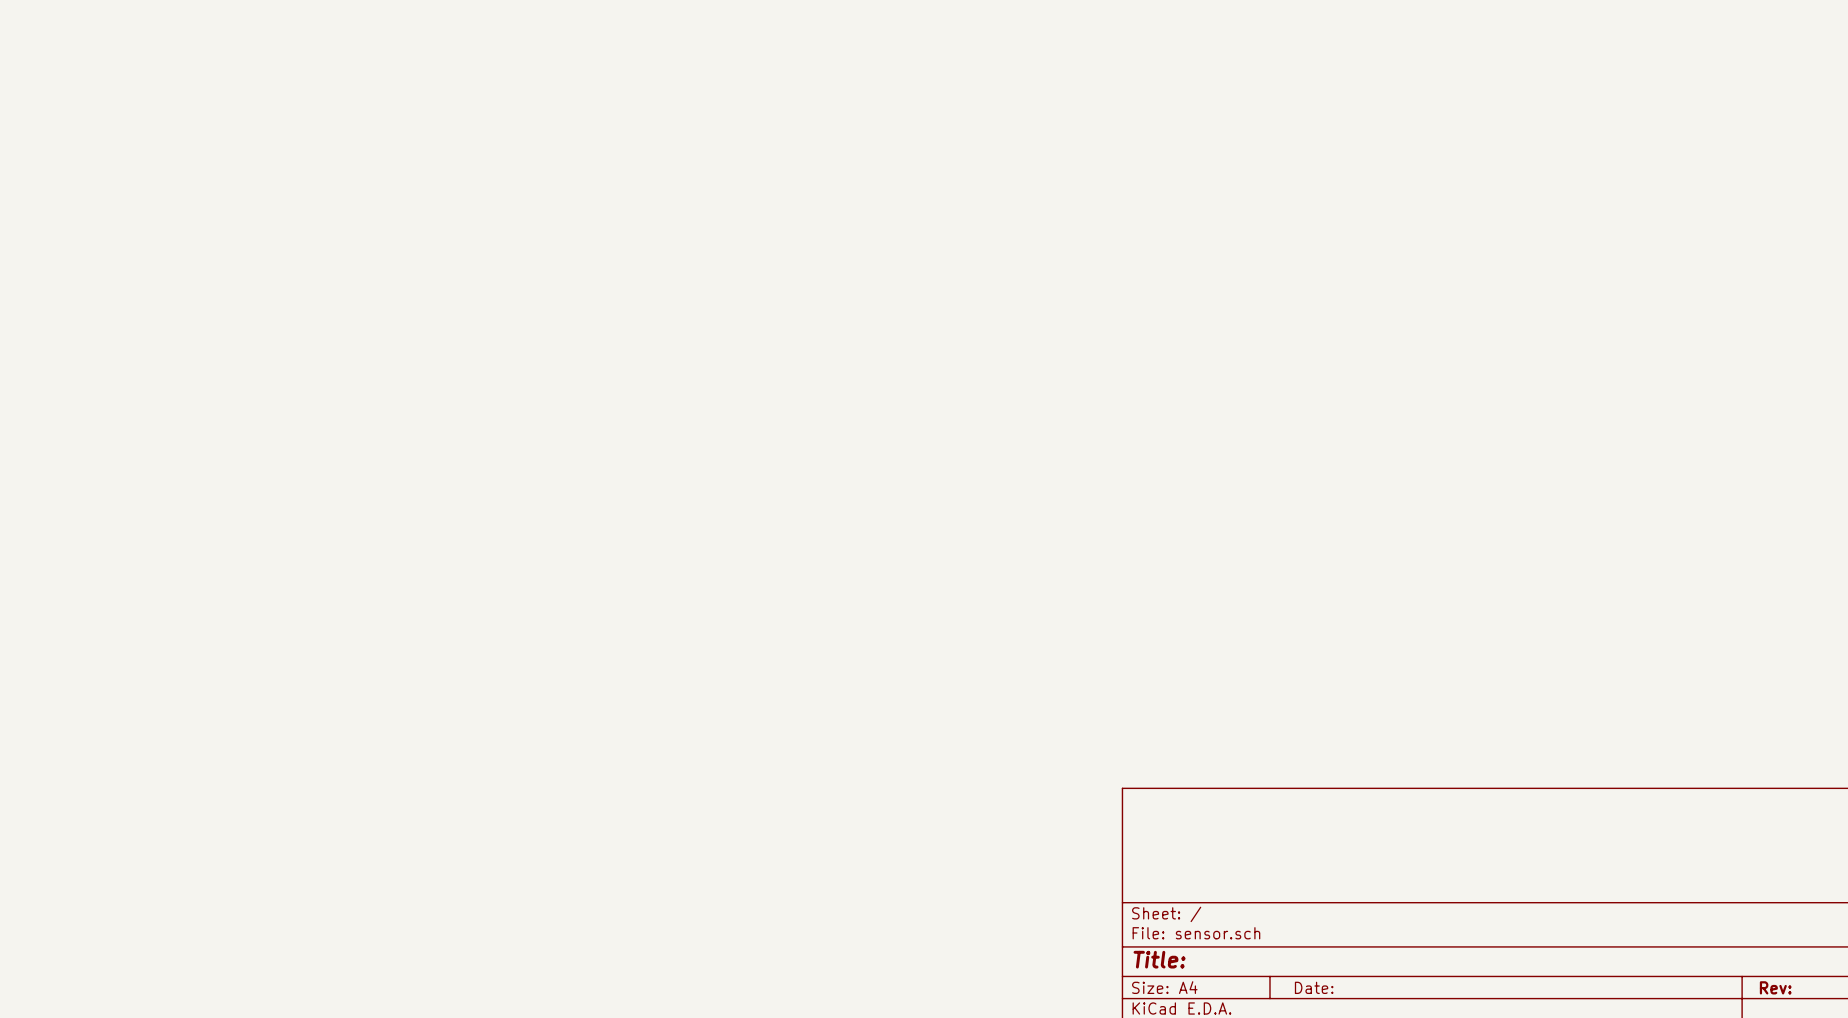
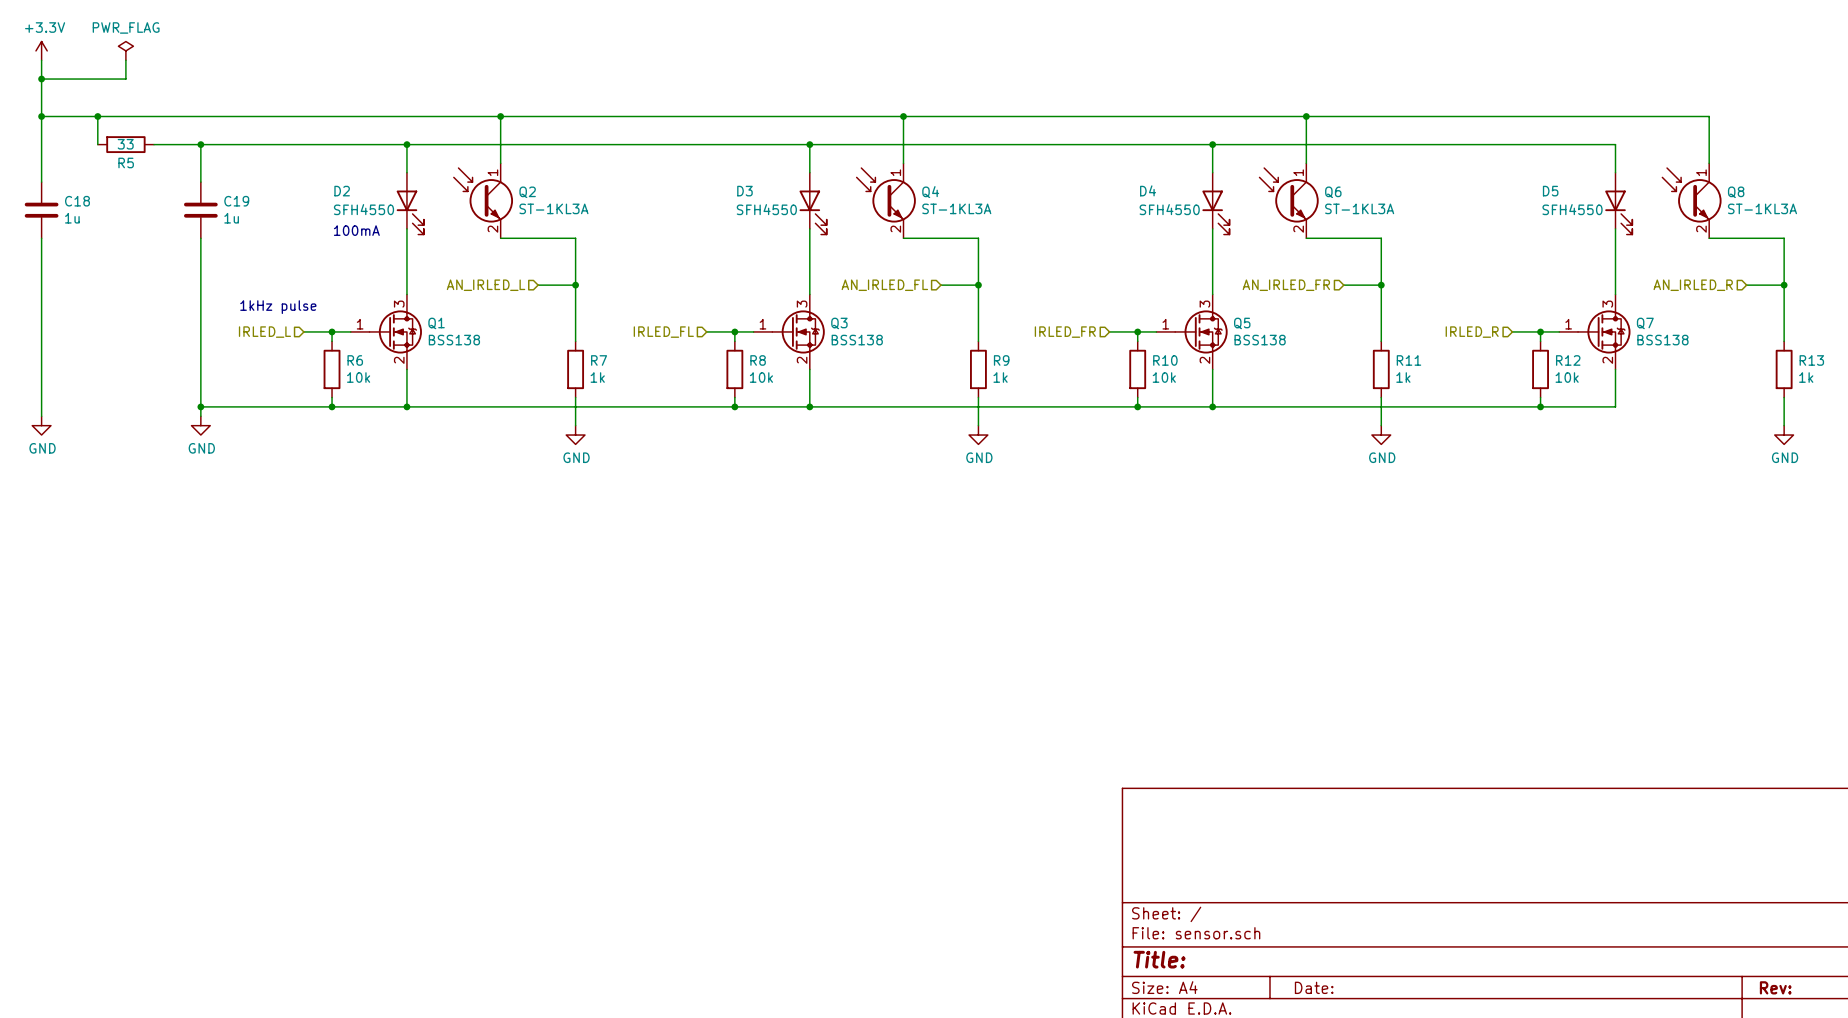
power symbol: none -> +3.3V (41, 50)
power symbol: none -> PWR_FLAG (125, 50)
wire: none -> (41, 60) (41, 182)
wire: none -> (125, 60) (125, 79) (41, 79)
junction: none -> (41, 79)
wire: none -> (41, 116) (1709, 116) (1709, 163)
junction: none -> (41, 116)
wire: none -> (97, 116) (97, 144)
junction: none -> (97, 116)
wire: none -> (500, 116) (500, 163)
junction: none -> (500, 116)
wire: none -> (903, 116) (903, 163)
junction: none -> (903, 116)
wire: none -> (1306, 116) (1306, 163)
junction: none -> (1306, 116)
R5: none -> 33 (125, 144)
wire: none -> (154, 144) (1615, 144) (1615, 172)
wire: none -> (200, 144) (200, 182)
junction: none -> (200, 144)
wire: none -> (406, 144) (406, 172)
junction: none -> (406, 144)
wire: none -> (809, 144) (809, 172)
junction: none -> (809, 144)
wire: none -> (1212, 144) (1212, 172)
junction: none -> (1212, 144)
Q2: none -> ST-1KL3A (483, 200)
Q4: none -> ST-1KL3A (886, 200)
Q6: none -> ST-1KL3A (1289, 200)
Q8: none -> ST-1KL3A (1691, 200)
D2: none -> SFH4550 (410, 203)
D3: none -> SFH4550 (813, 203)
D4: none -> SFH4550 (1215, 203)
D5: none -> SFH4550 (1618, 203)
C18: none -> 1u (41, 210)
C19: none -> 1u (200, 210)
wire: none -> (406, 228) (406, 294)
wire: none -> (809, 228) (809, 294)
wire: none -> (1212, 228) (1212, 294)
wire: none -> (1615, 228) (1615, 294)
text: none -> 100mA (356, 230)
wire: none -> (41, 238) (41, 416)
wire: none -> (200, 238) (200, 416)
wire: none -> (500, 238) (575, 238) (575, 341)
wire: none -> (903, 238) (978, 238) (978, 341)
wire: none -> (1306, 238) (1381, 238) (1381, 341)
wire: none -> (1709, 238) (1784, 238) (1784, 341)
hierarchical label: none -> AN_IRLED_L (486, 285)
wire: none -> (538, 285) (575, 285)
junction: none -> (575, 285)
hierarchical label: none -> AN_IRLED_FL (884, 285)
wire: none -> (940, 285) (978, 285)
junction: none -> (978, 285)
hierarchical label: none -> AN_IRLED_FR (1286, 285)
wire: none -> (1343, 285) (1381, 285)
junction: none -> (1381, 285)
hierarchical label: none -> AN_IRLED_R (1693, 285)
wire: none -> (1746, 285) (1784, 285)
junction: none -> (1784, 285)
text: none -> 1kHz pulse (278, 307)
wire: none -> (303, 331) (350, 331)
wire: none -> (332, 331) (332, 341)
junction: none -> (332, 331)
Q1: none -> BSS138 (386, 331)
wire: none -> (706, 331) (753, 331)
wire: none -> (734, 331) (734, 341)
junction: none -> (734, 331)
Q3: none -> BSS138 (789, 331)
wire: none -> (1109, 331) (1156, 331)
wire: none -> (1137, 331) (1137, 341)
junction: none -> (1137, 331)
Q5: none -> BSS138 (1192, 331)
wire: none -> (1512, 331) (1559, 331)
wire: none -> (1540, 331) (1540, 341)
junction: none -> (1540, 331)
Q7: none -> BSS138 (1594, 331)
hierarchical label: none -> IRLED_L (264, 332)
hierarchical label: none -> IRLED_FL (663, 332)
hierarchical label: none -> IRLED_FR (1065, 332)
hierarchical label: none -> IRLED_R (1472, 332)
R6: none -> 10k (332, 369)
wire: none -> (406, 369) (406, 406)
R7: none -> 1k (575, 369)
R8: none -> 10k (734, 369)
wire: none -> (809, 369) (809, 406)
R9: none -> 1k (978, 369)
R10: none -> 10k (1137, 369)
wire: none -> (1212, 369) (1212, 406)
R11: none -> 1k (1381, 369)
R12: none -> 10k (1540, 369)
wire: none -> (1615, 369) (1615, 406) (200, 406)
R13: none -> 1k (1784, 369)
wire: none -> (332, 397) (332, 406)
wire: none -> (575, 397) (575, 425)
wire: none -> (734, 397) (734, 406)
wire: none -> (978, 397) (978, 425)
wire: none -> (1137, 397) (1137, 406)
wire: none -> (1381, 397) (1381, 425)
wire: none -> (1540, 397) (1540, 406)
wire: none -> (1784, 397) (1784, 425)
junction: none -> (200, 406)
junction: none -> (332, 406)
junction: none -> (406, 406)
junction: none -> (734, 406)
junction: none -> (809, 406)
junction: none -> (1137, 406)
junction: none -> (1212, 406)
junction: none -> (1540, 406)
power symbol: none -> GND (41, 425)
power symbol: none -> GND (200, 425)
power symbol: none -> GND (575, 435)
power symbol: none -> GND (978, 435)
power symbol: none -> GND (1381, 435)
power symbol: none -> GND (1784, 435)

